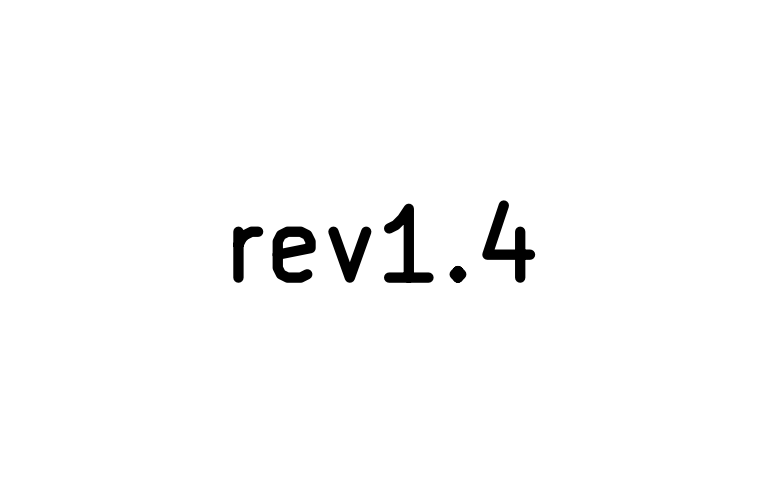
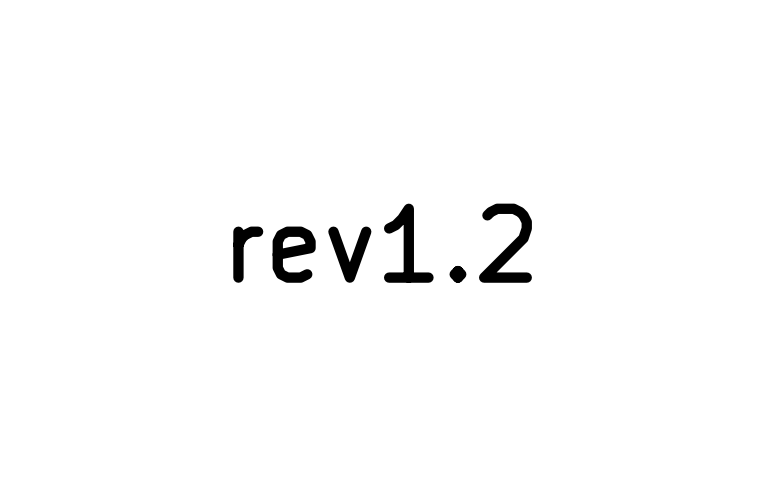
text: rev1.4 (384, 241) -> rev1.2 (382, 243)

